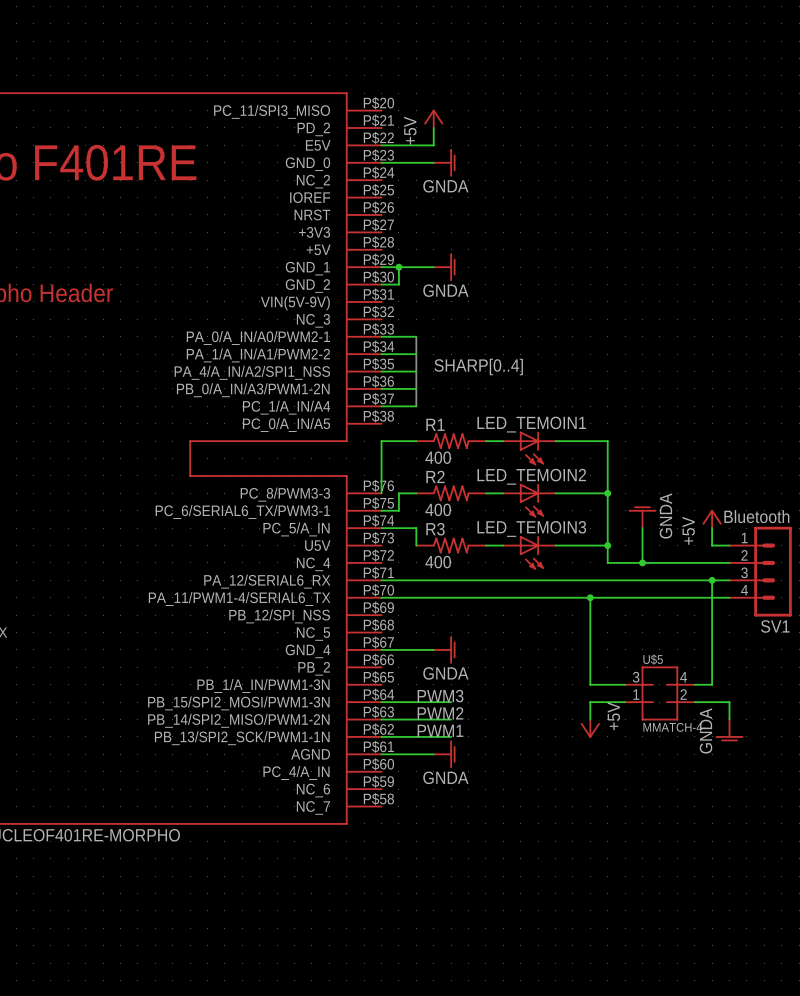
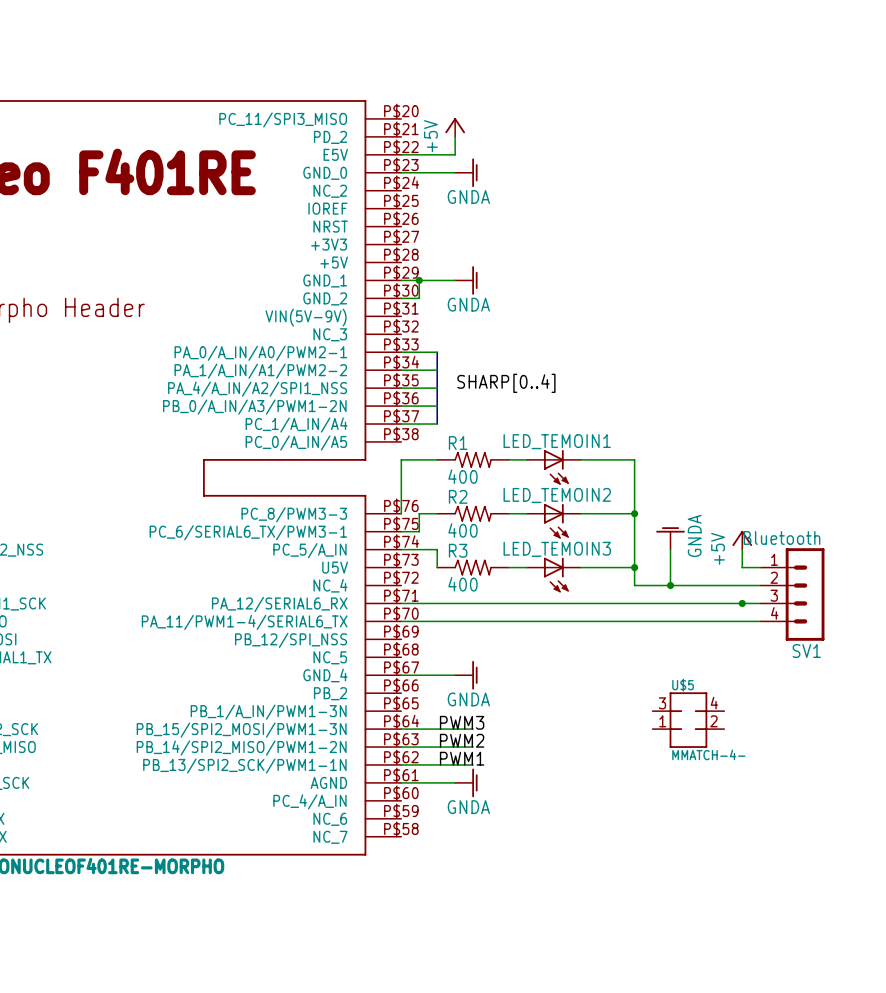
wire: (712, 580) (712, 684) (694, 684) -> none
wire: (590, 597) (590, 684) (625, 684) -> none
junction: (590, 597) -> none
wire: (625, 702) (590, 702) (590, 719) -> none
wire: (694, 702) (729, 702) (729, 719) -> none
power symbol: +5V (590, 728) -> none
power symbol: GNDA (729, 730) -> none

